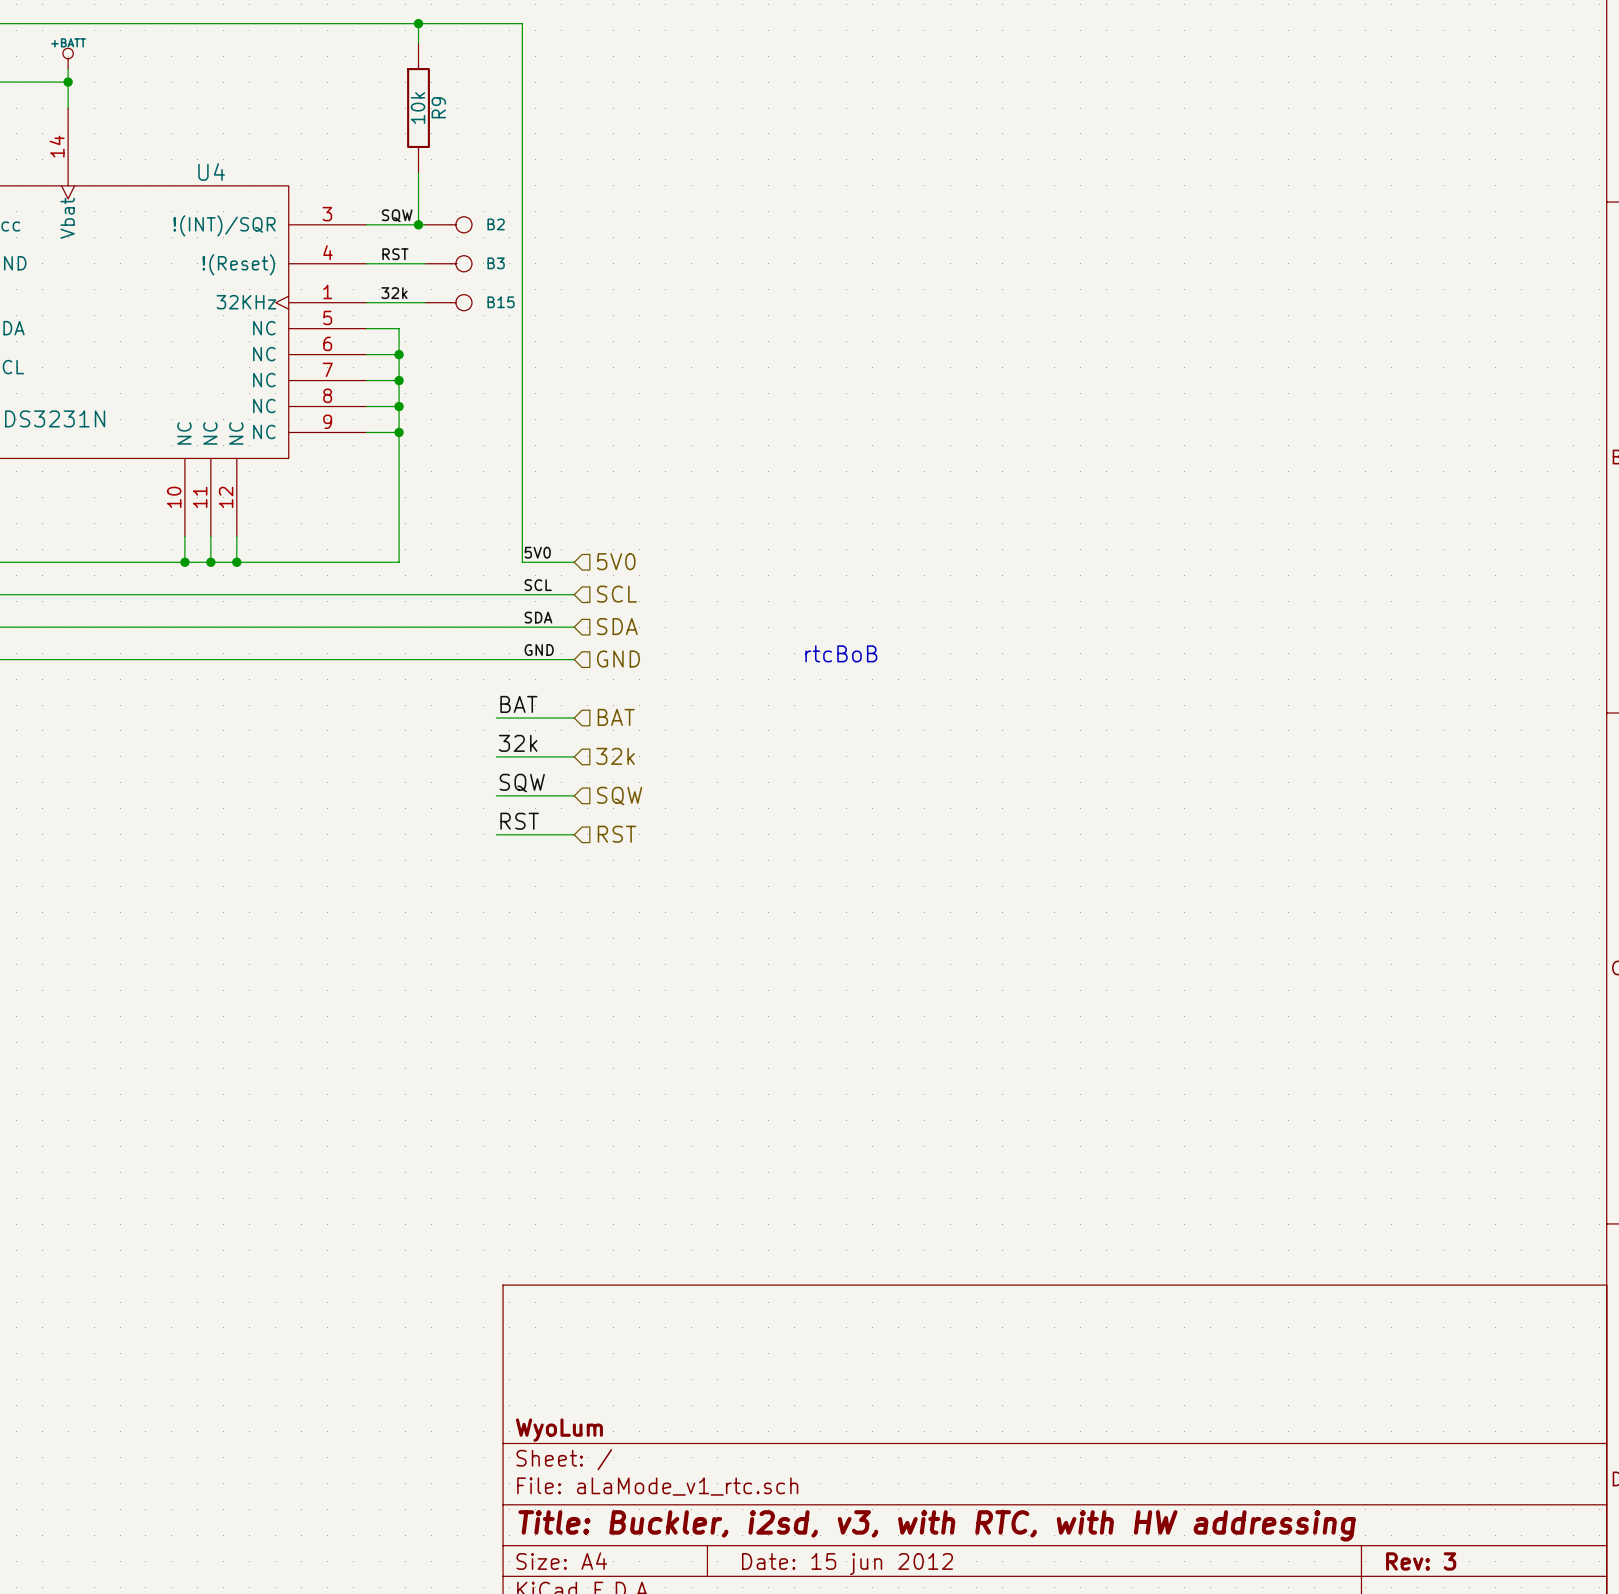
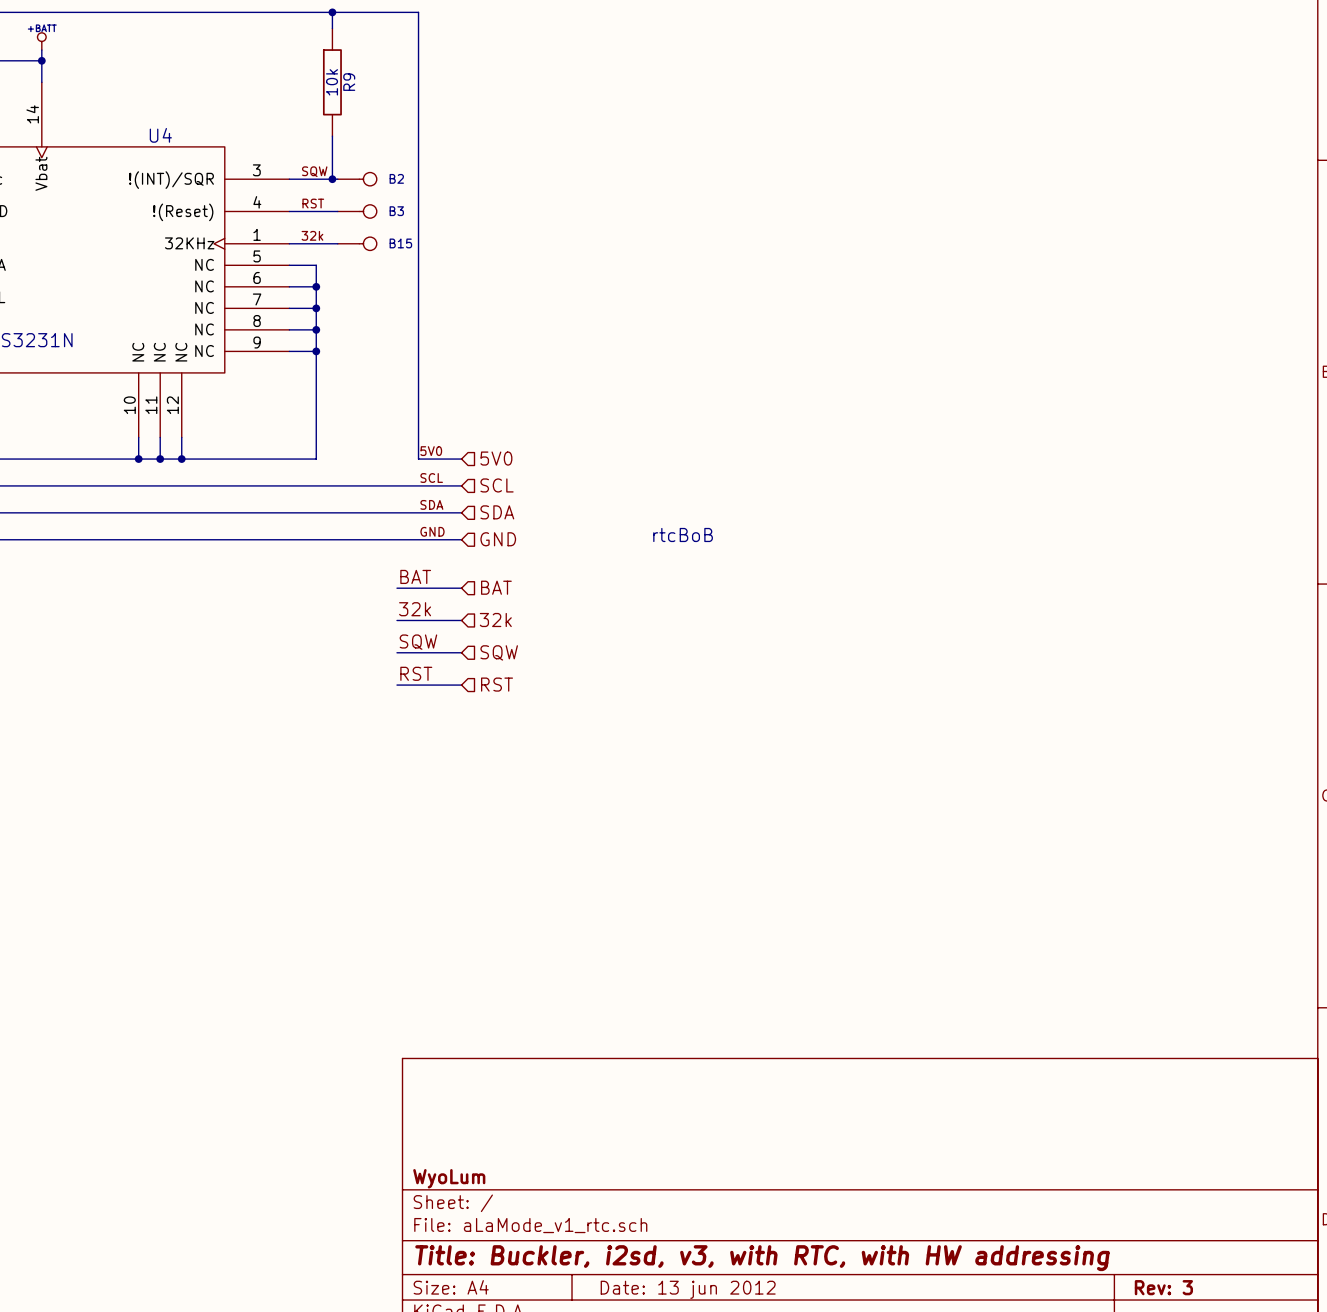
title block: Date: 15 jun 2012 (847, 1564) -> Date: 13 jun 2012 (688, 1289)

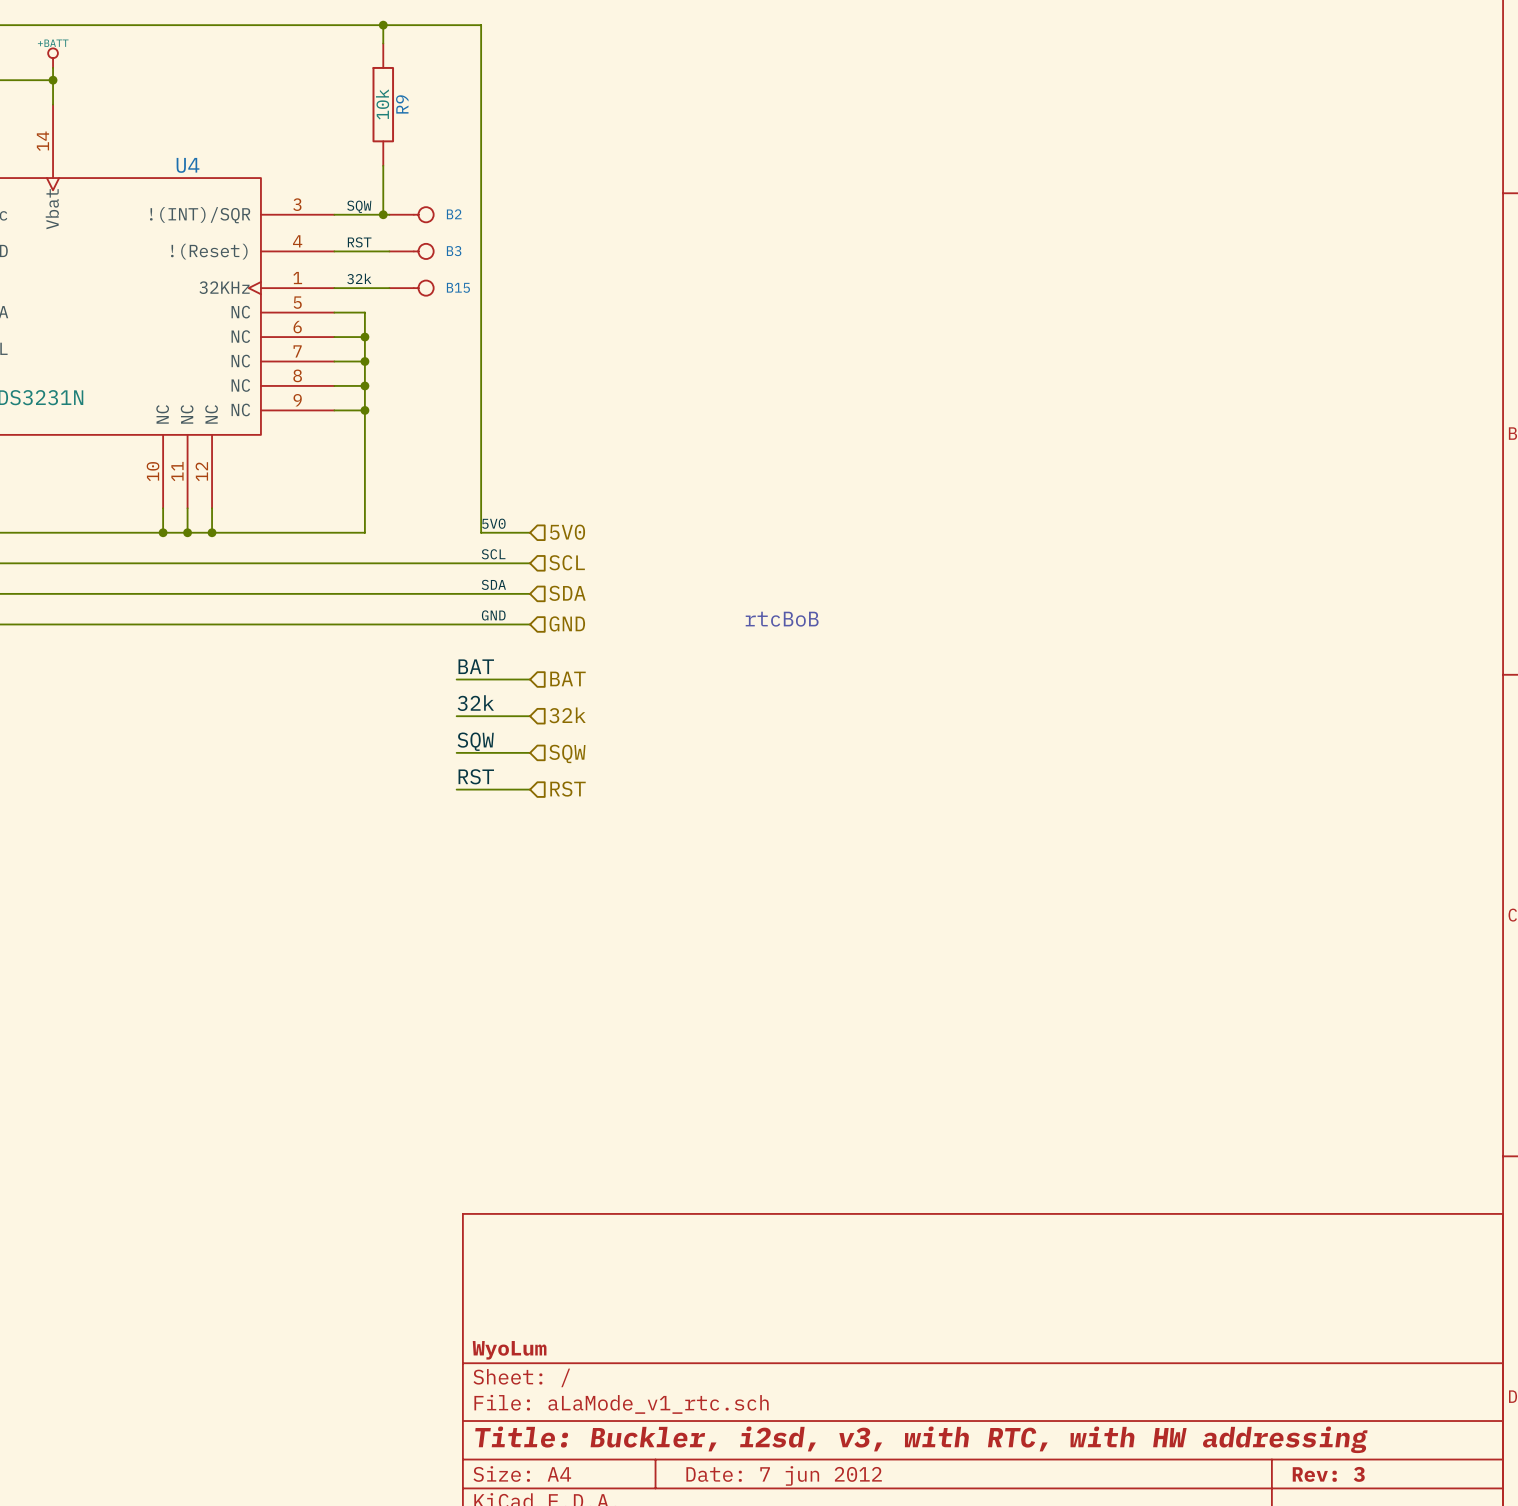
title block: Date: 13 jun 2012 (688, 1289) -> Date: 7 jun 2012 (784, 1475)

